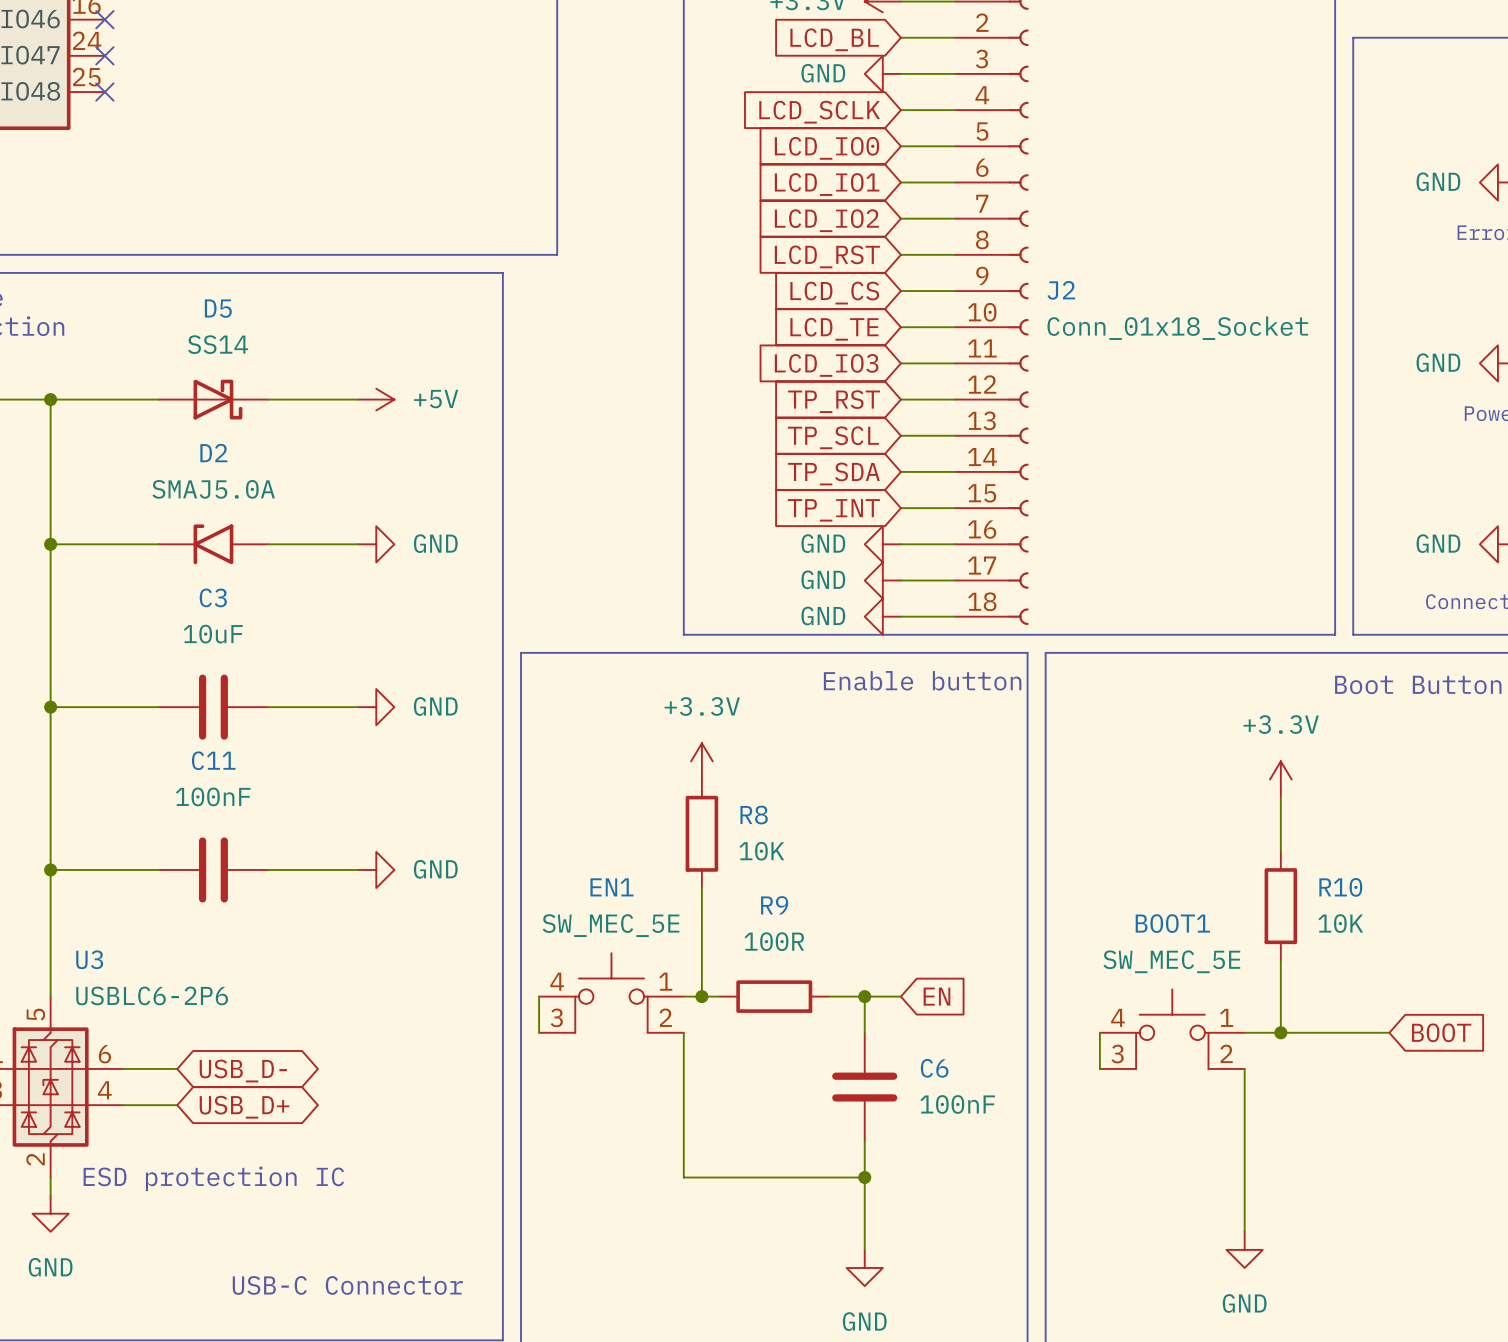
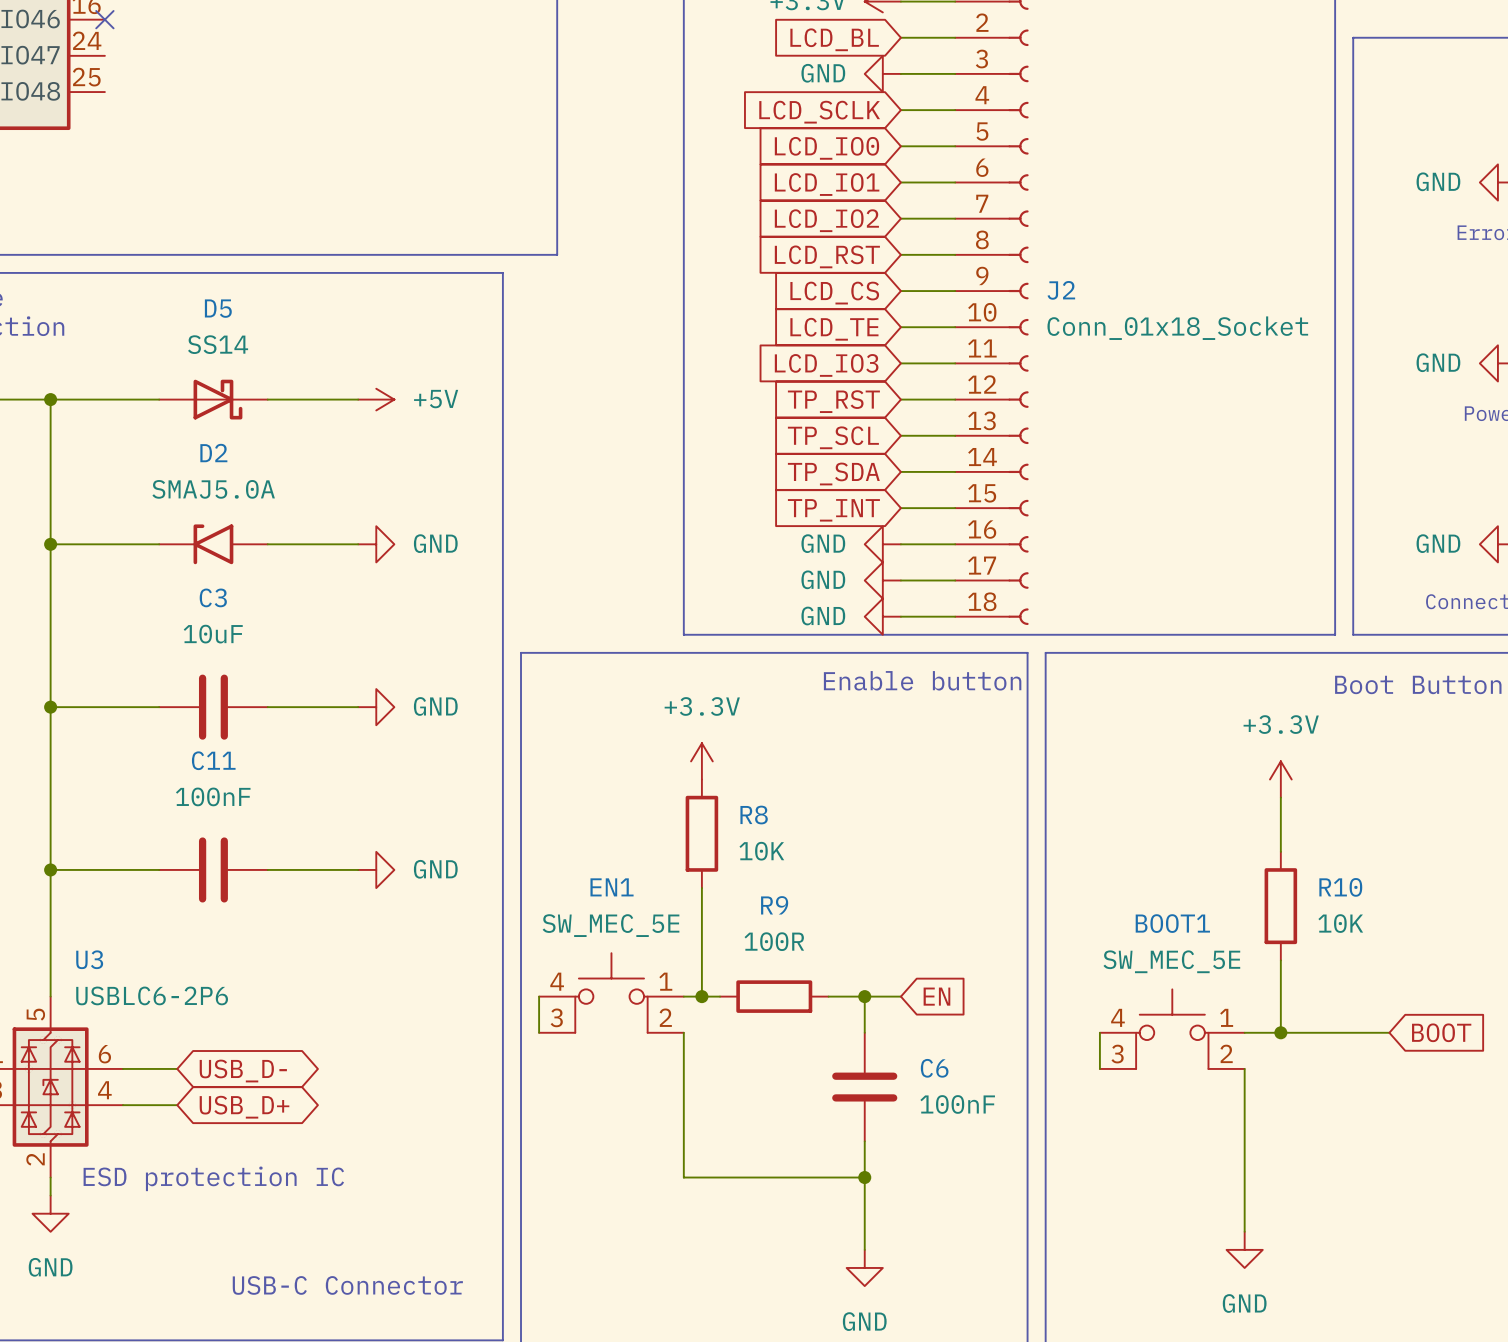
no-connect mark: (104, 55) -> none
no-connect mark: (104, 92) -> none

